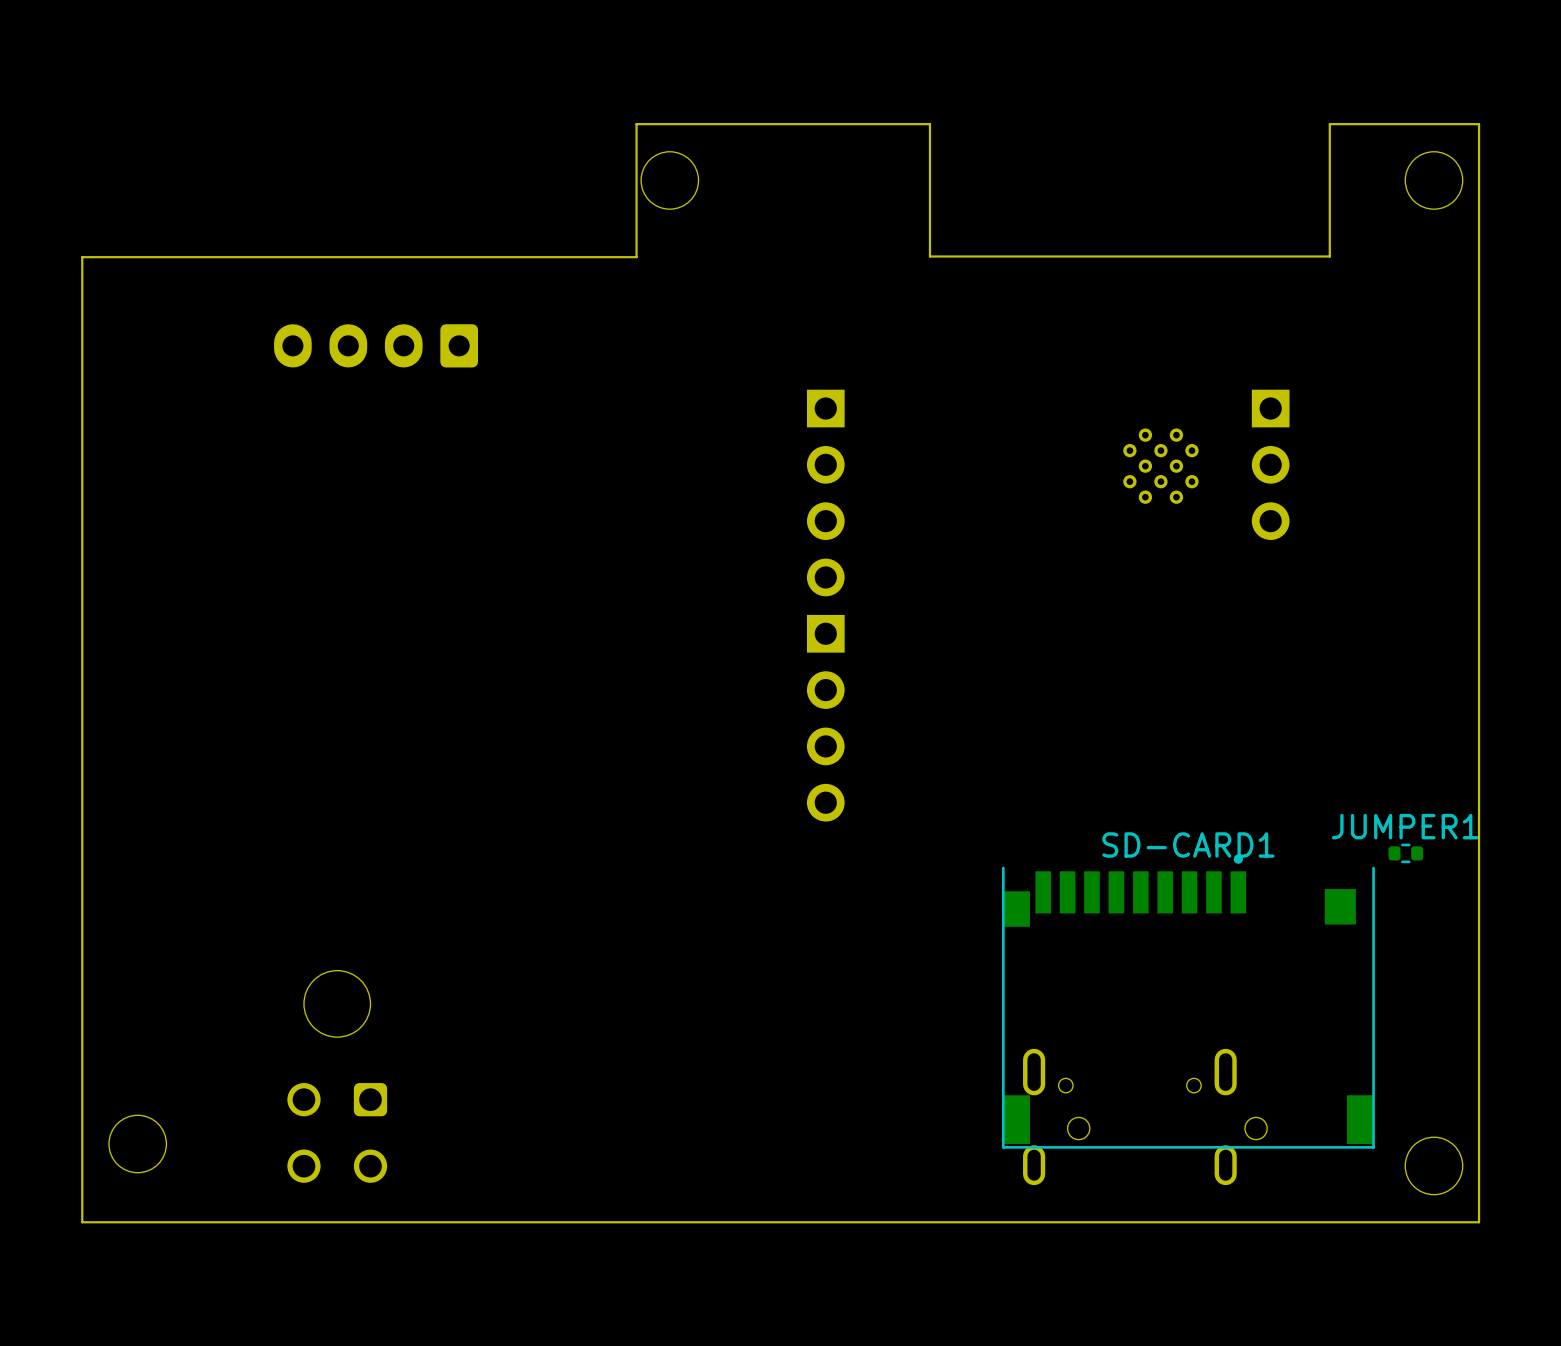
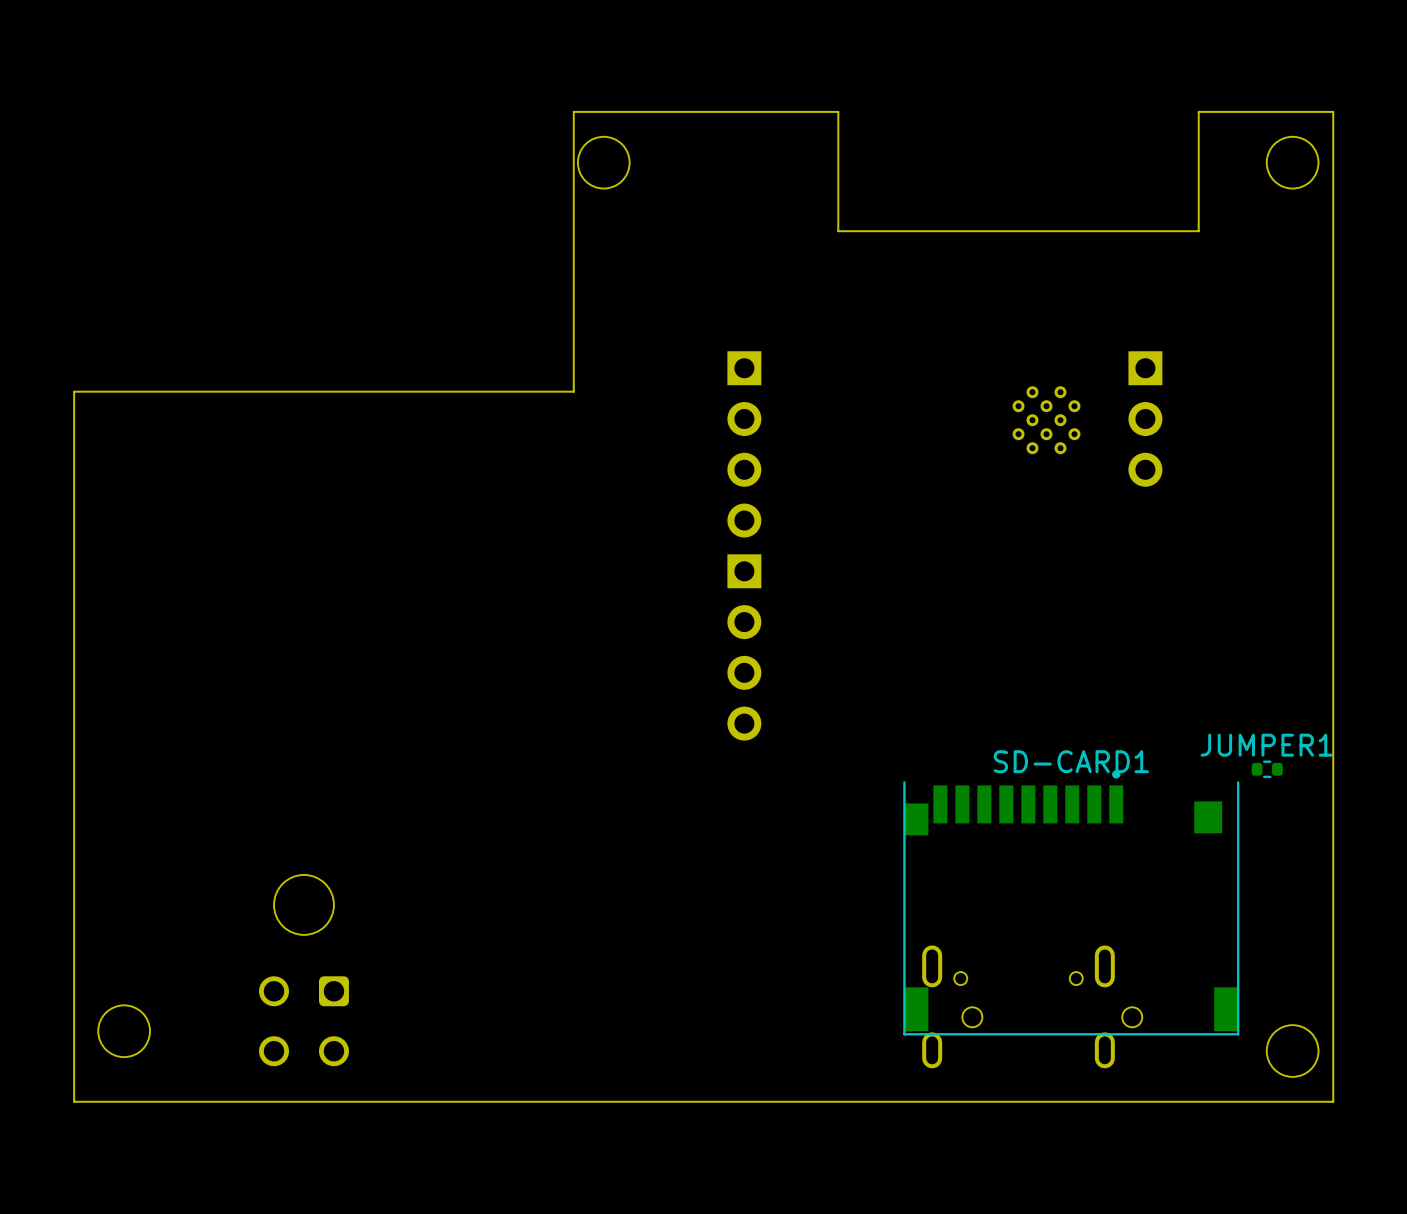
board edge: (636, 257) (82, 257) (82, 434) -> (573, 231) (573, 391) (74, 391)
part: (376, 345) -> none

